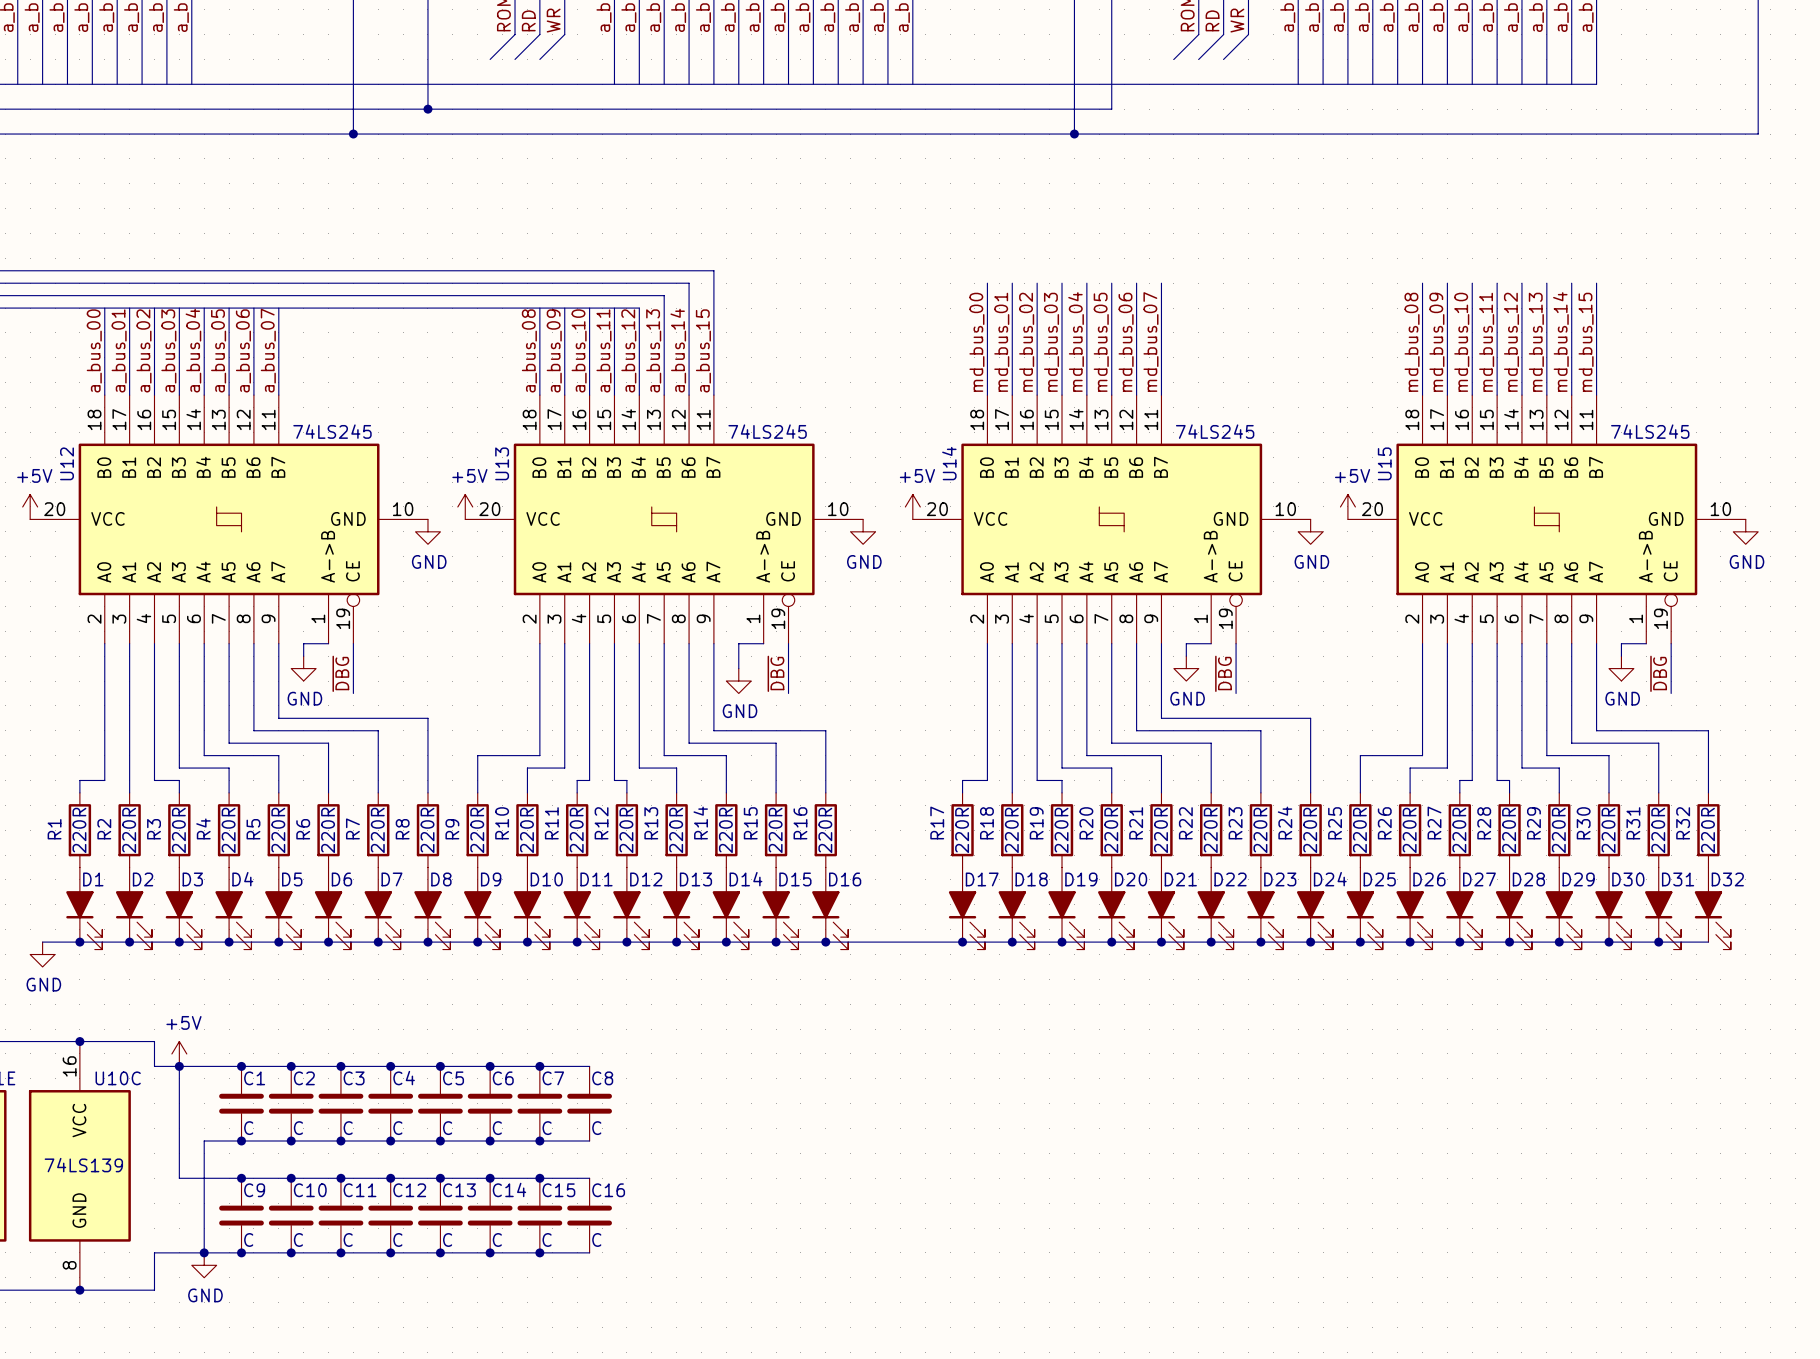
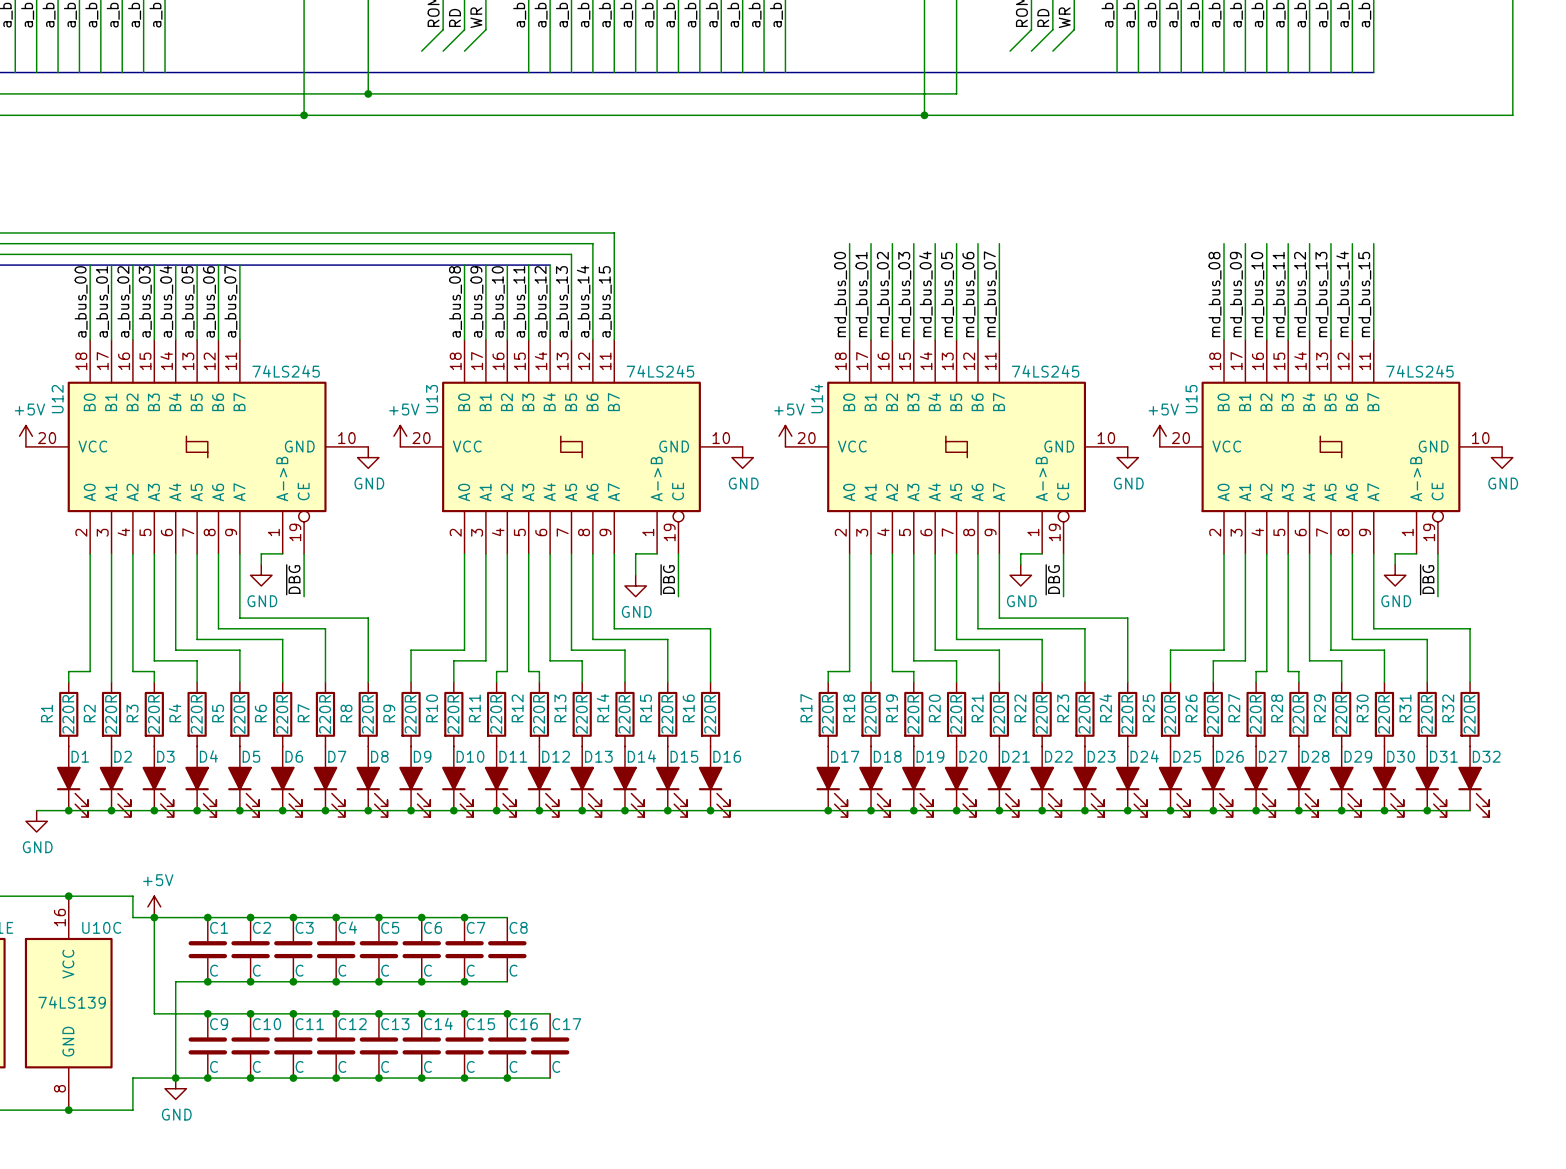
wire: none -> (507, 1013) (550, 1013)
junction: none -> (507, 1013)
C17: none -> C (550, 1045)
wire: none -> (507, 1078) (550, 1078)
junction: none -> (507, 1078)

